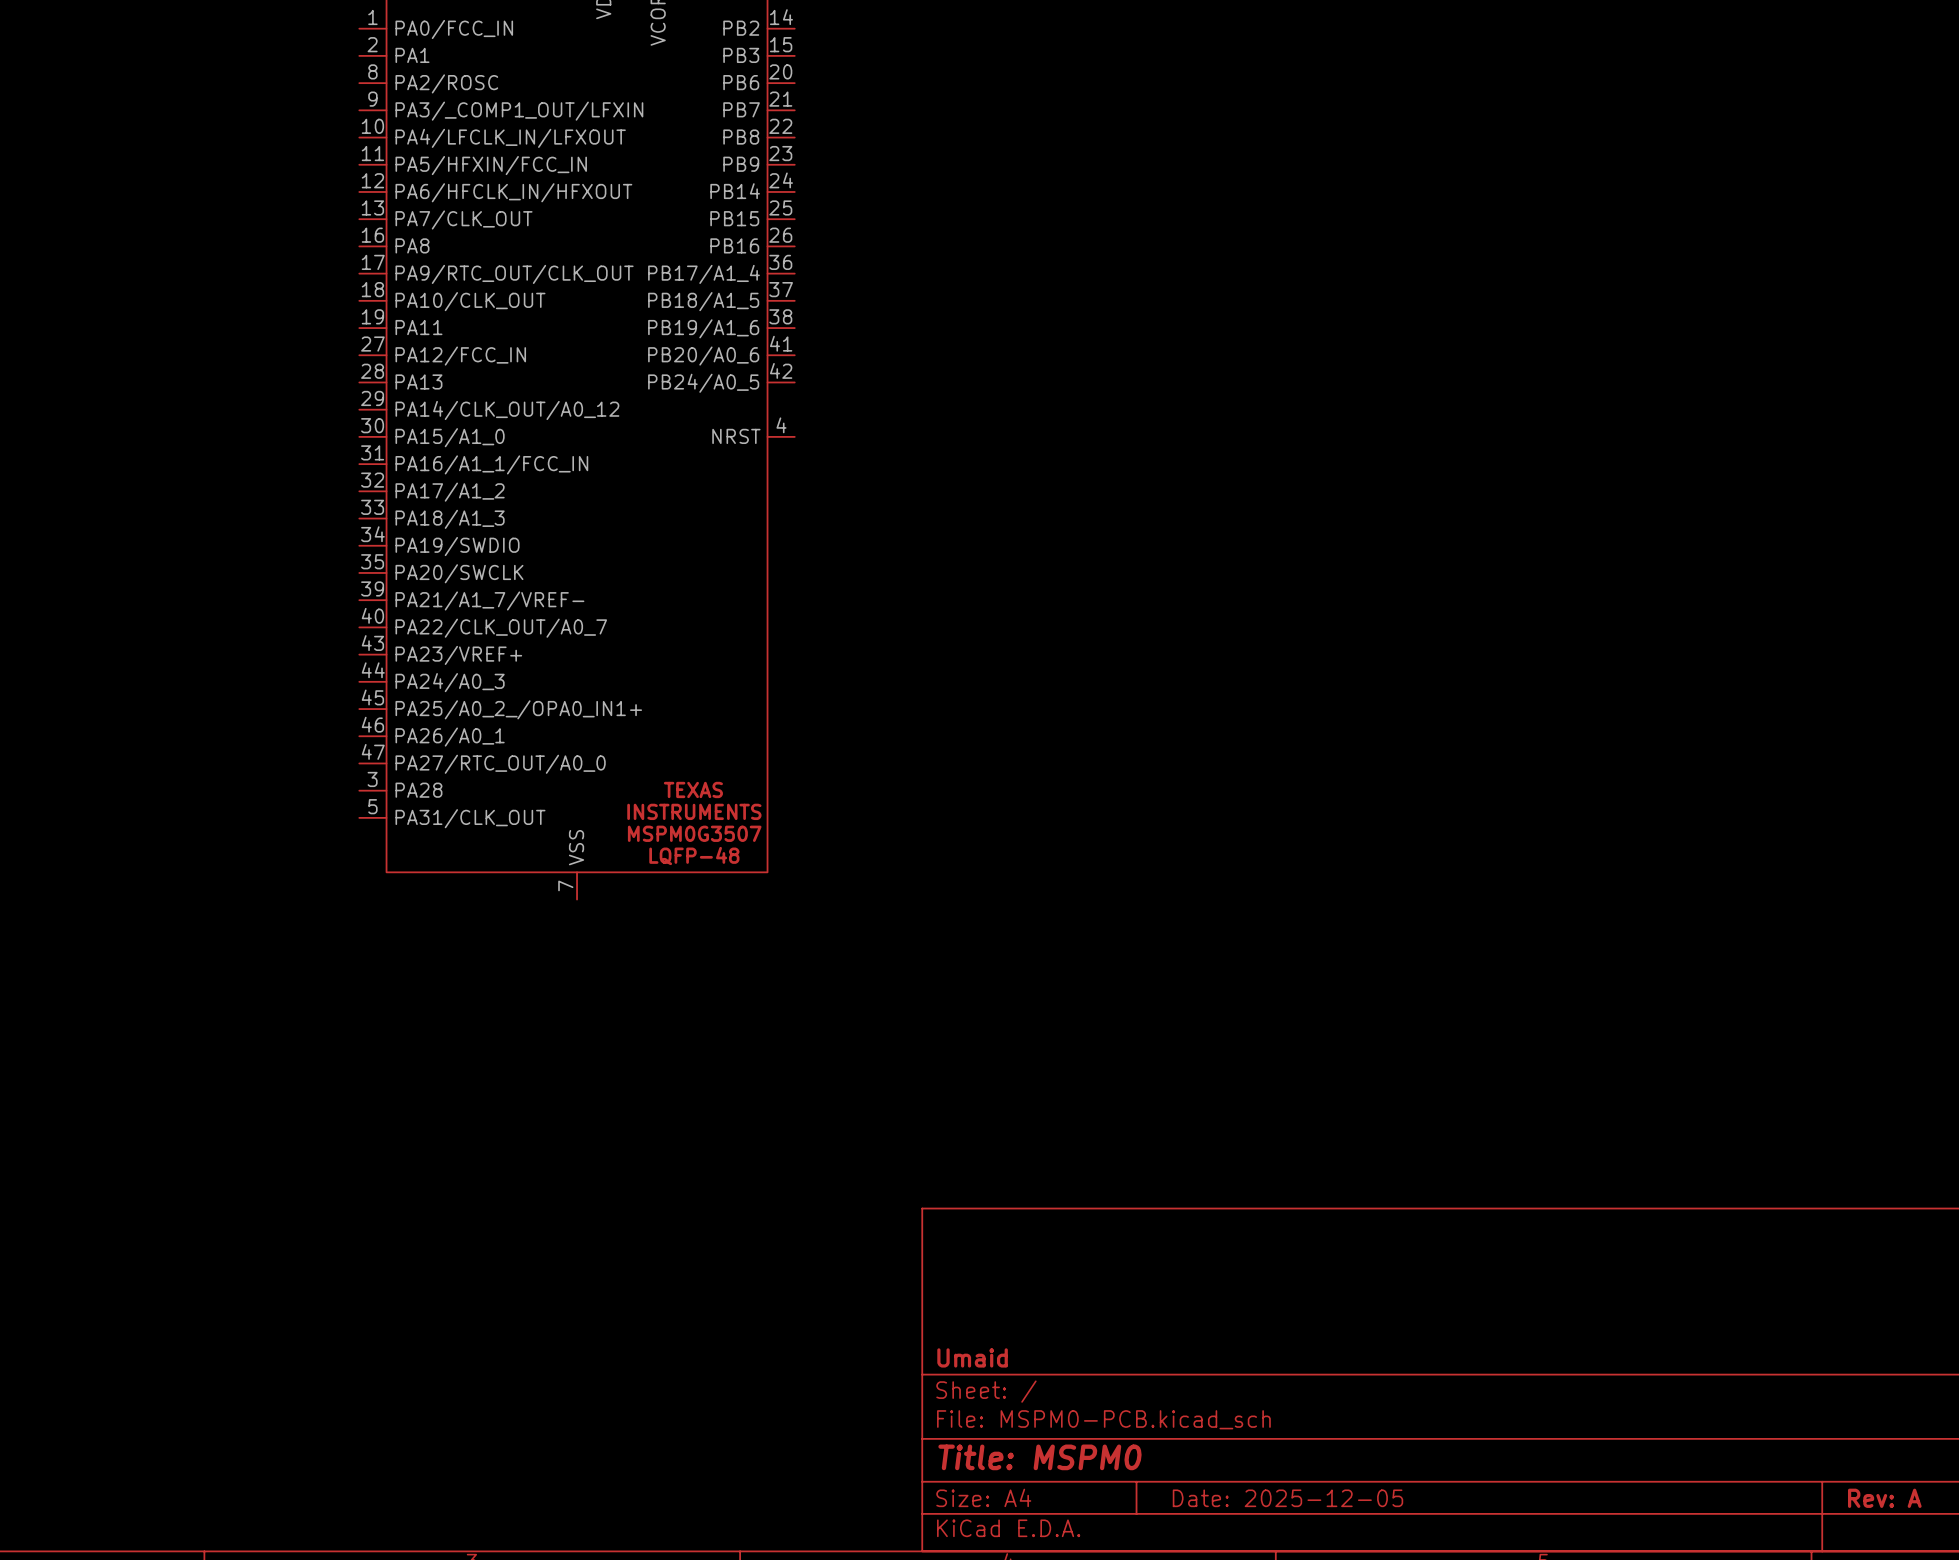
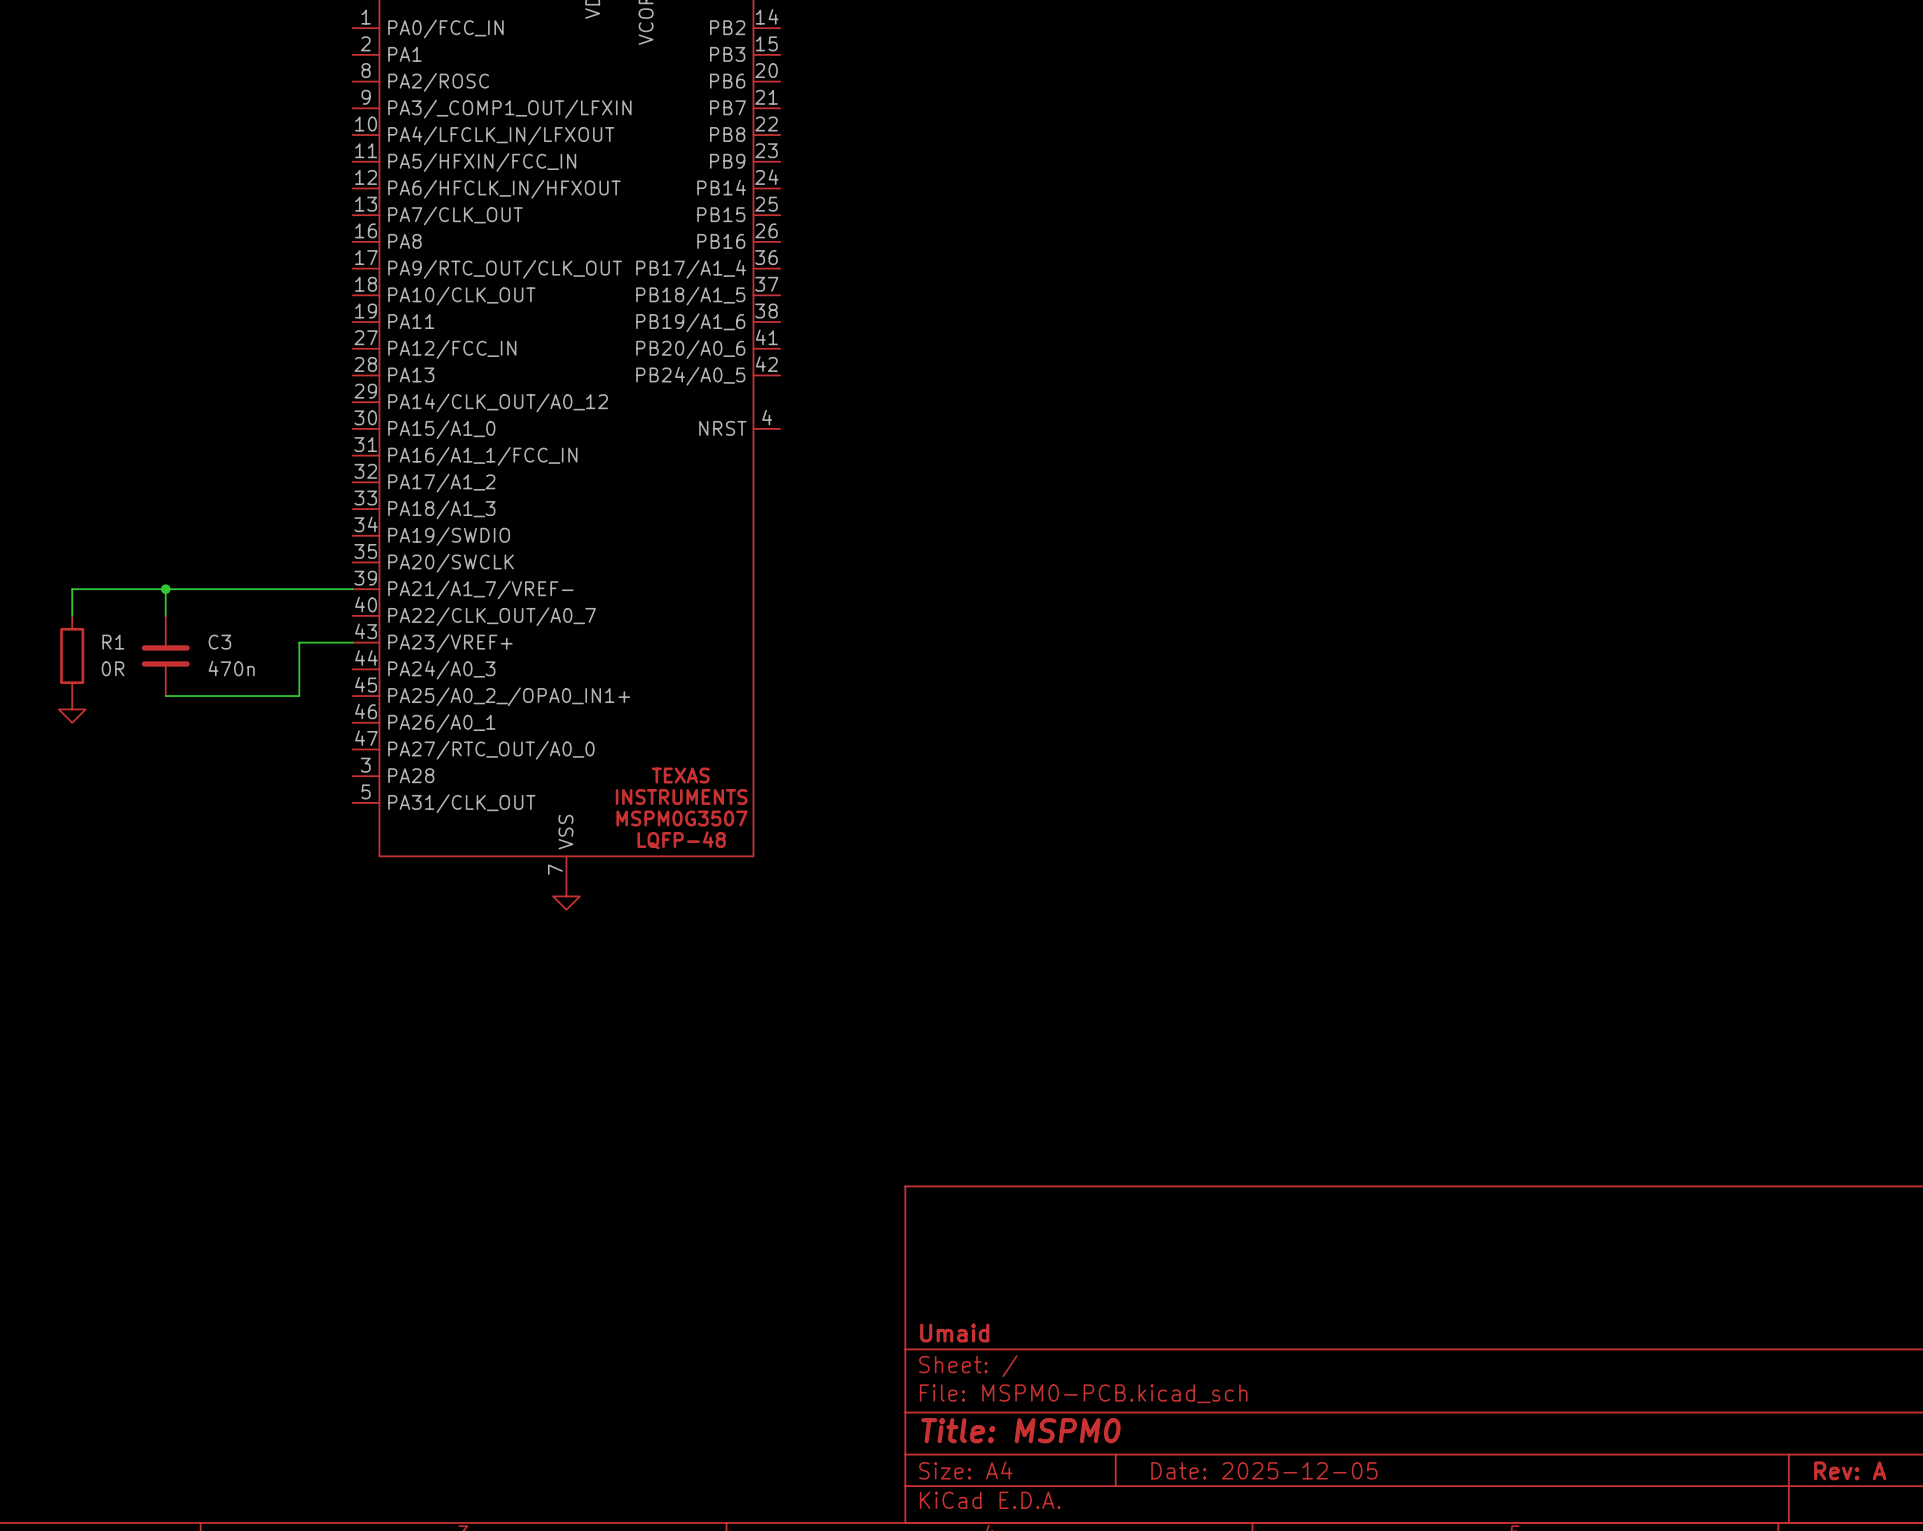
wire: none -> (165, 589) (165, 615)
junction: none -> (165, 589)
wire: none -> (352, 589) (72, 589) (72, 615)
wire: none -> (352, 642) (299, 642) (299, 696) (165, 696)
R1: none -> 0R (72, 655)
C3: none -> 470n (165, 655)
power symbol: none -> (72, 709)
power symbol: none -> (566, 896)

